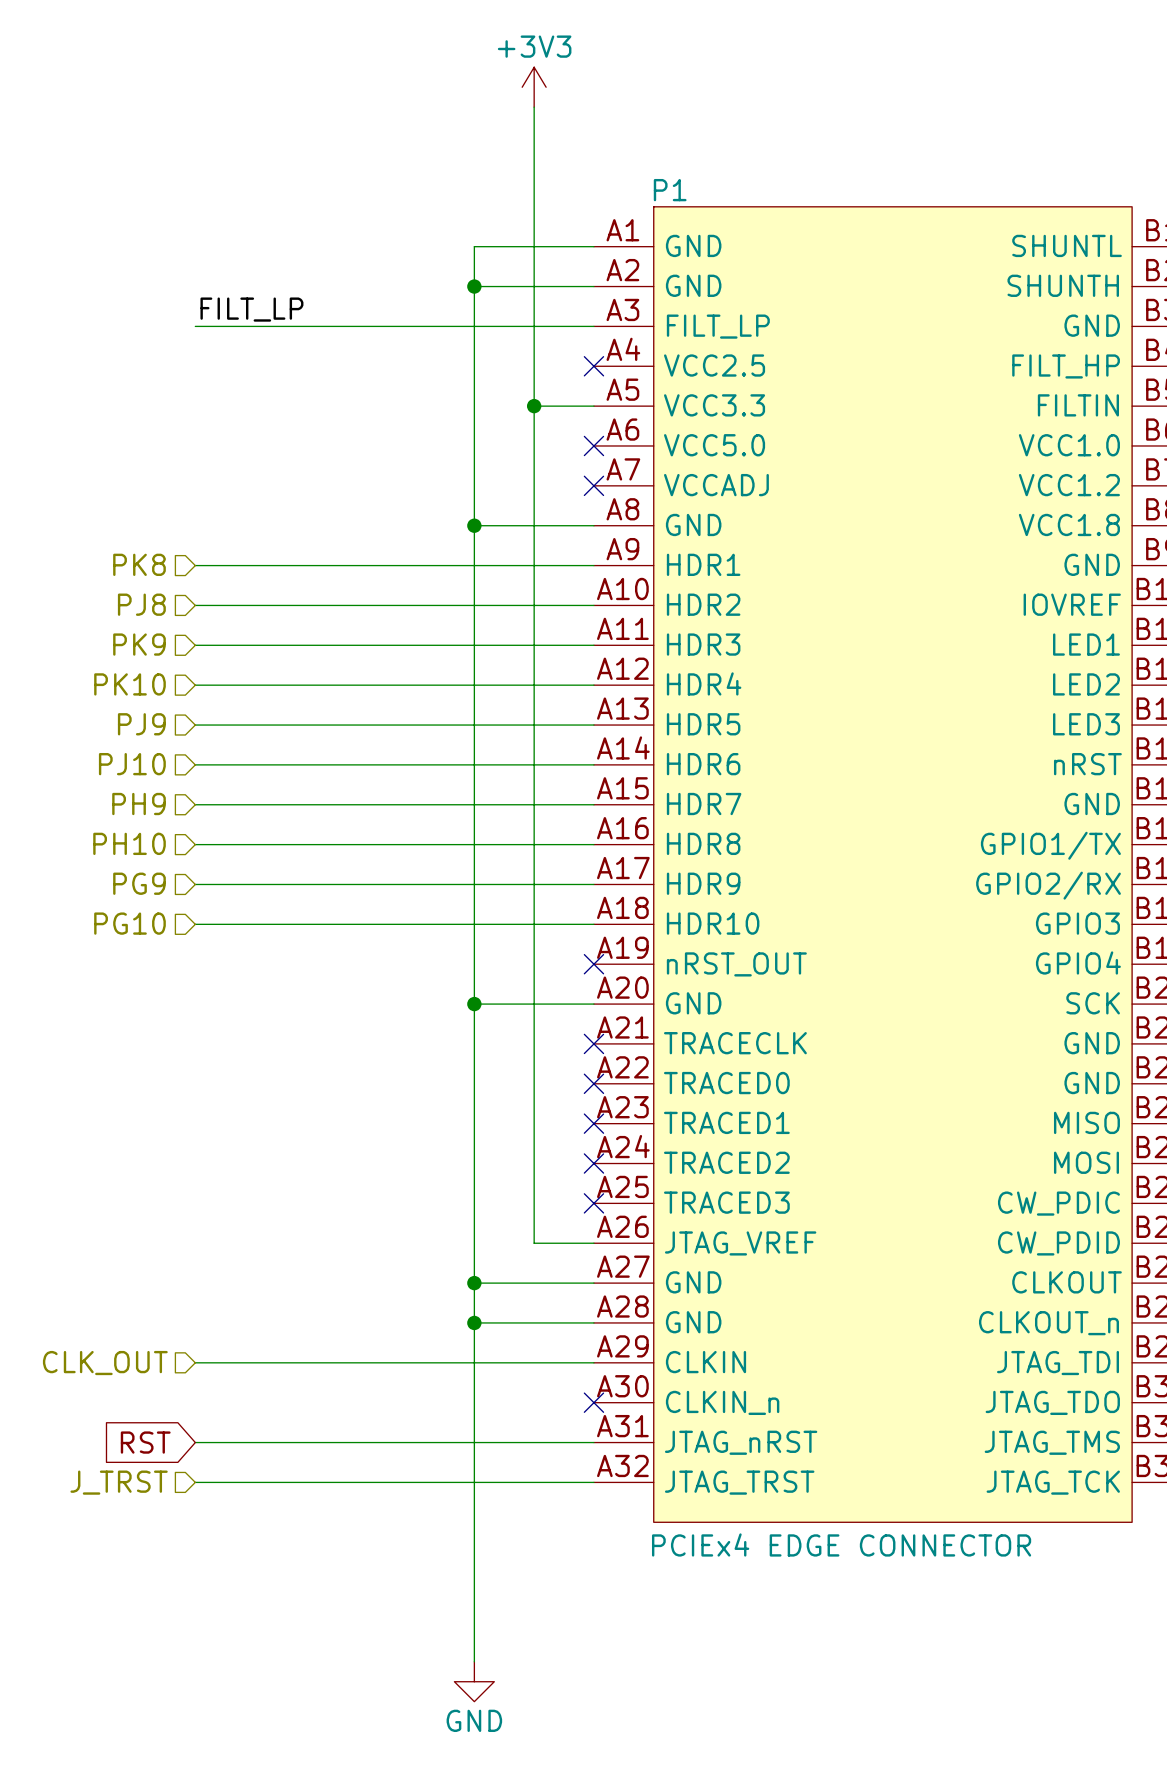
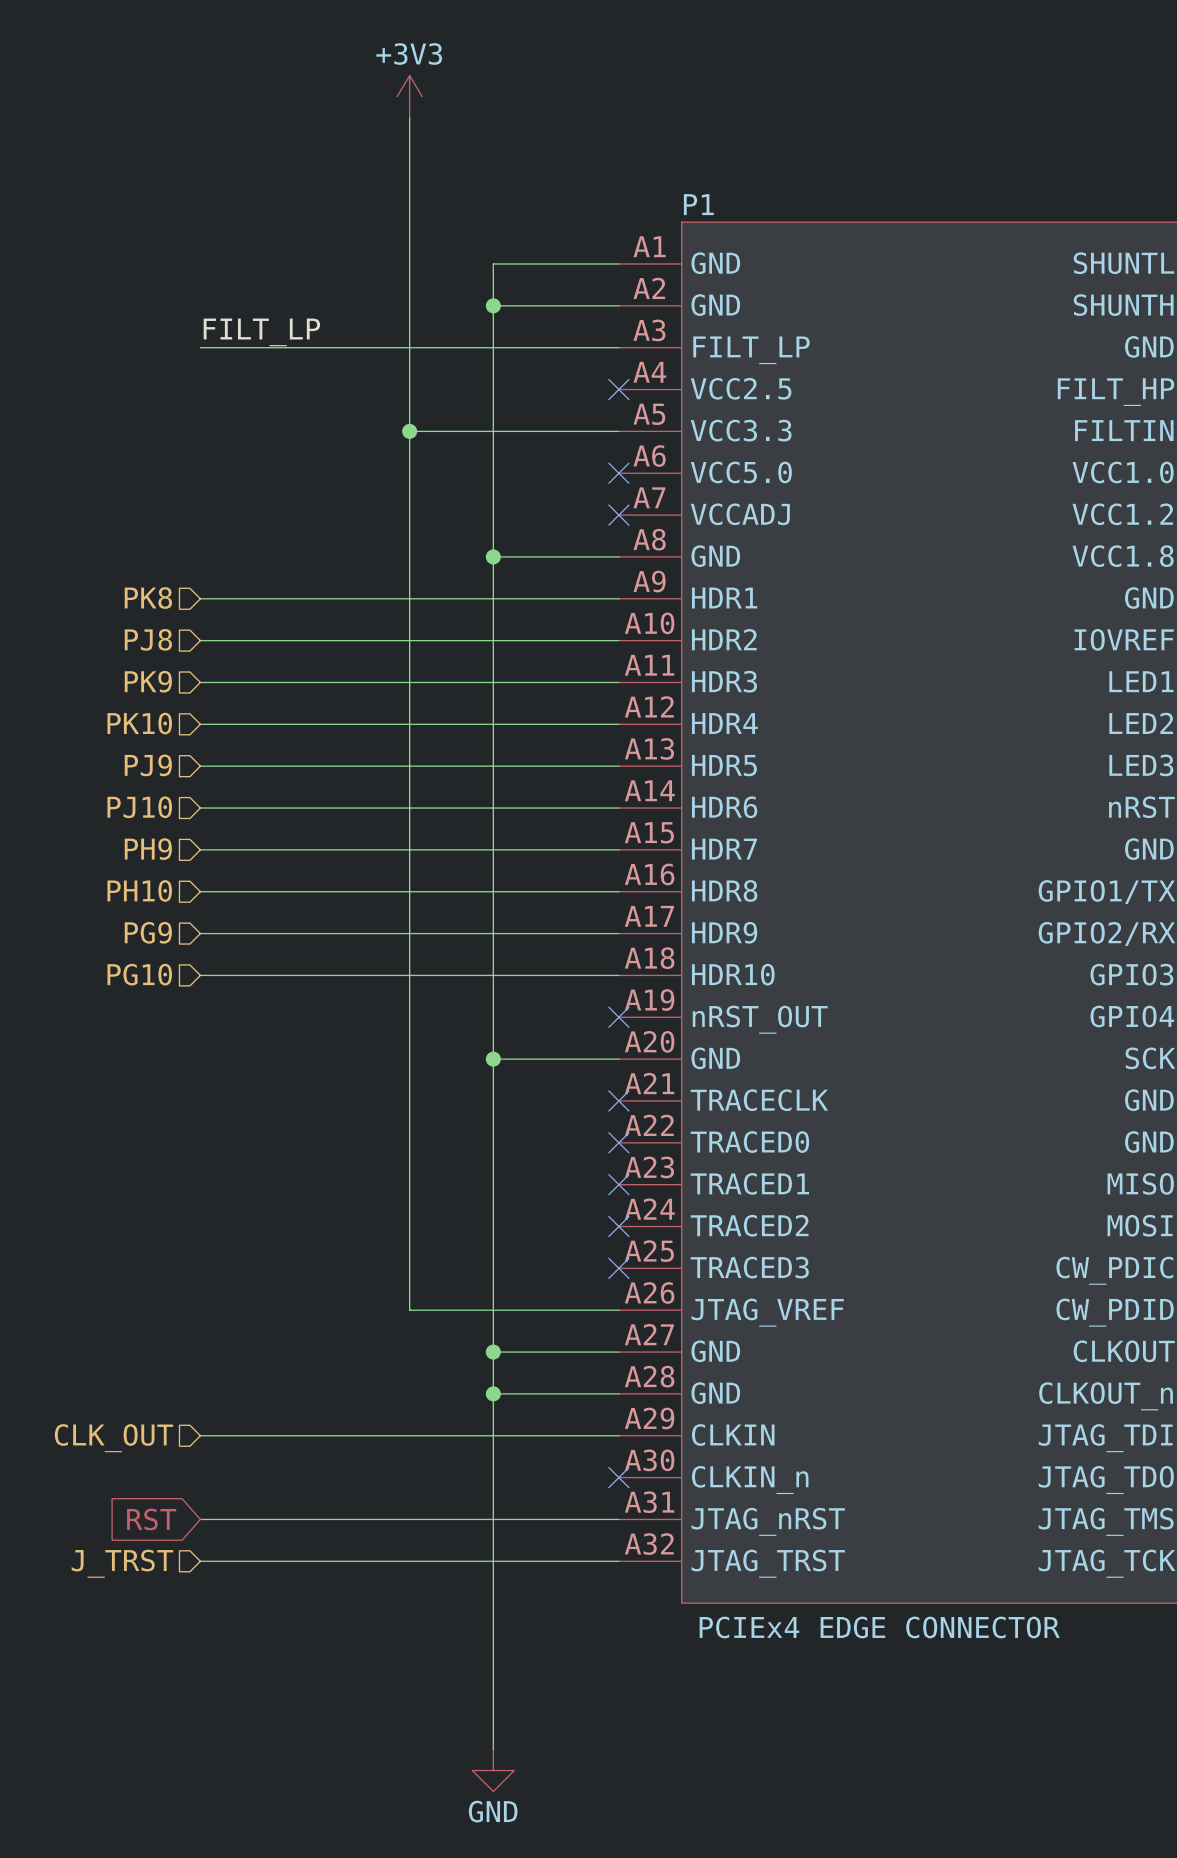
power symbol position: +3V3 (534, 87) -> +3V3 (409, 96)
wire: (534, 107) (534, 1243) -> (409, 117) (409, 1310) (556, 1310)
wire: none -> (409, 431) (556, 431)
junction: none -> (409, 431)
junction: (534, 406) -> none

